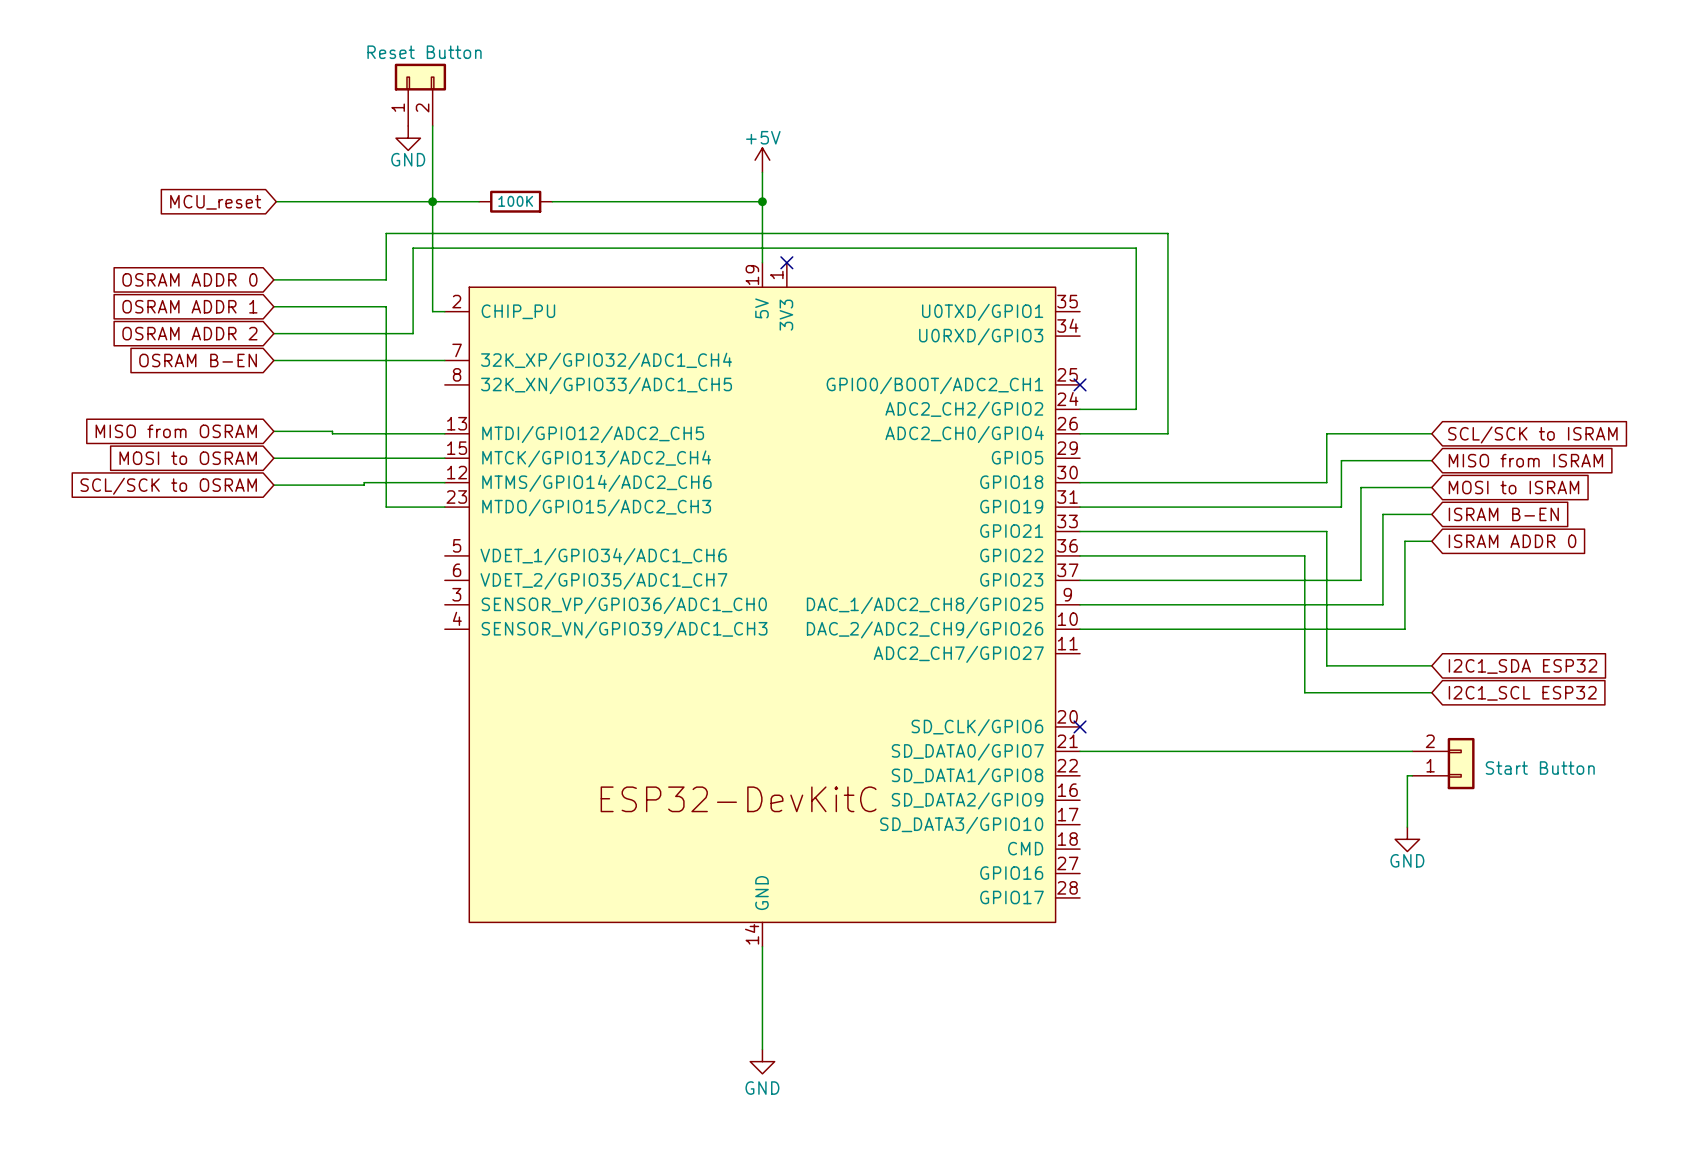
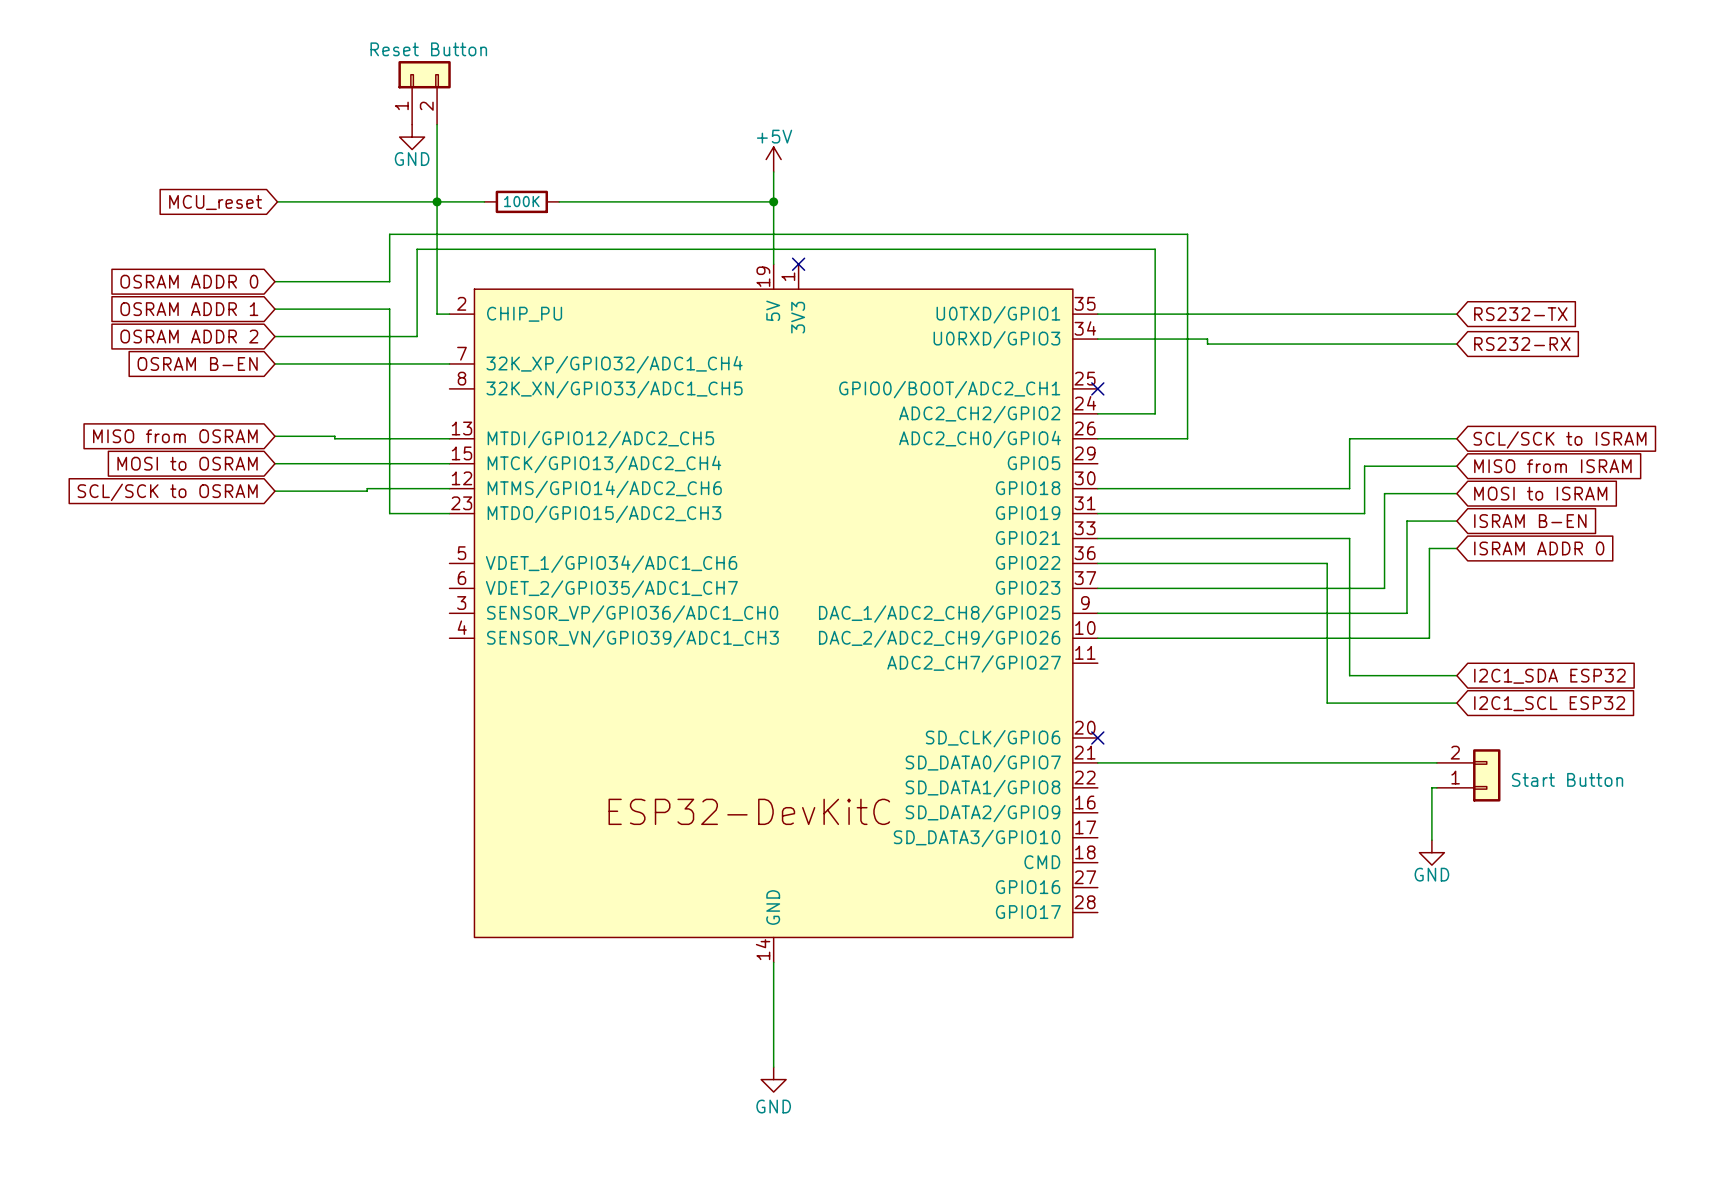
wire: none -> (1097, 314) (1456, 314)
global label: none -> RS232-TX (1520, 314)
wire: none -> (1097, 339) (1207, 339) (1207, 344) (1456, 344)
global label: none -> RS232-RX (1522, 344)

